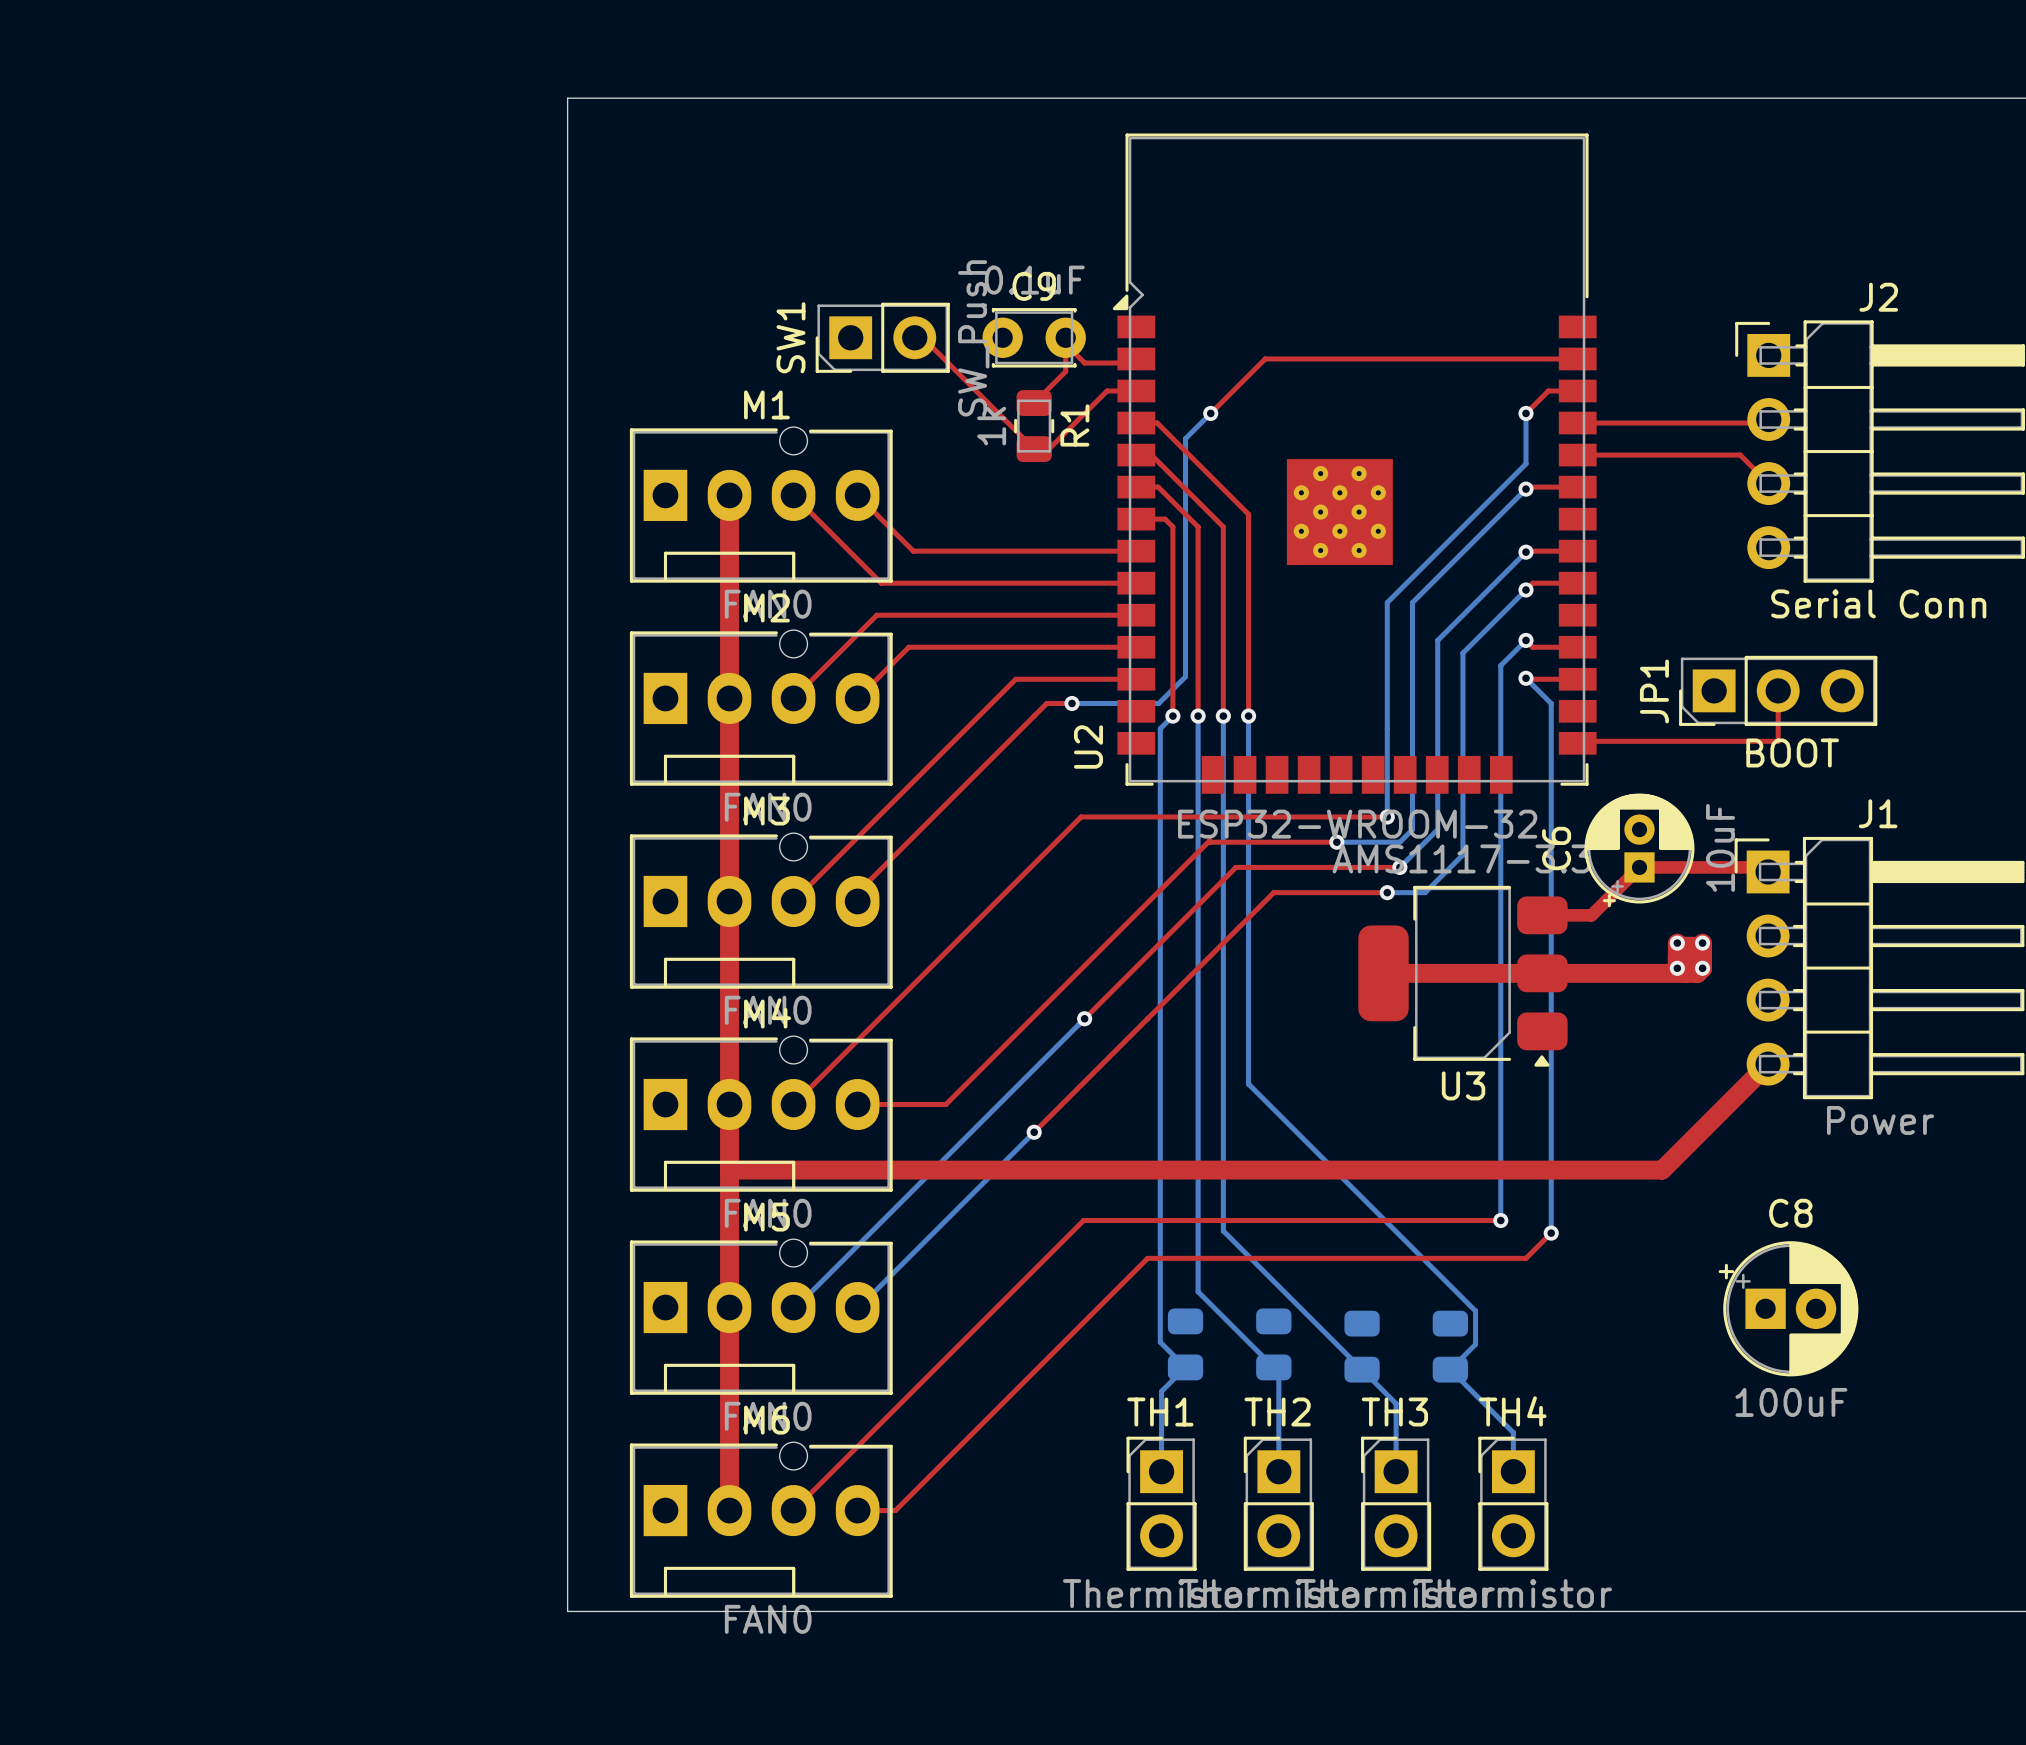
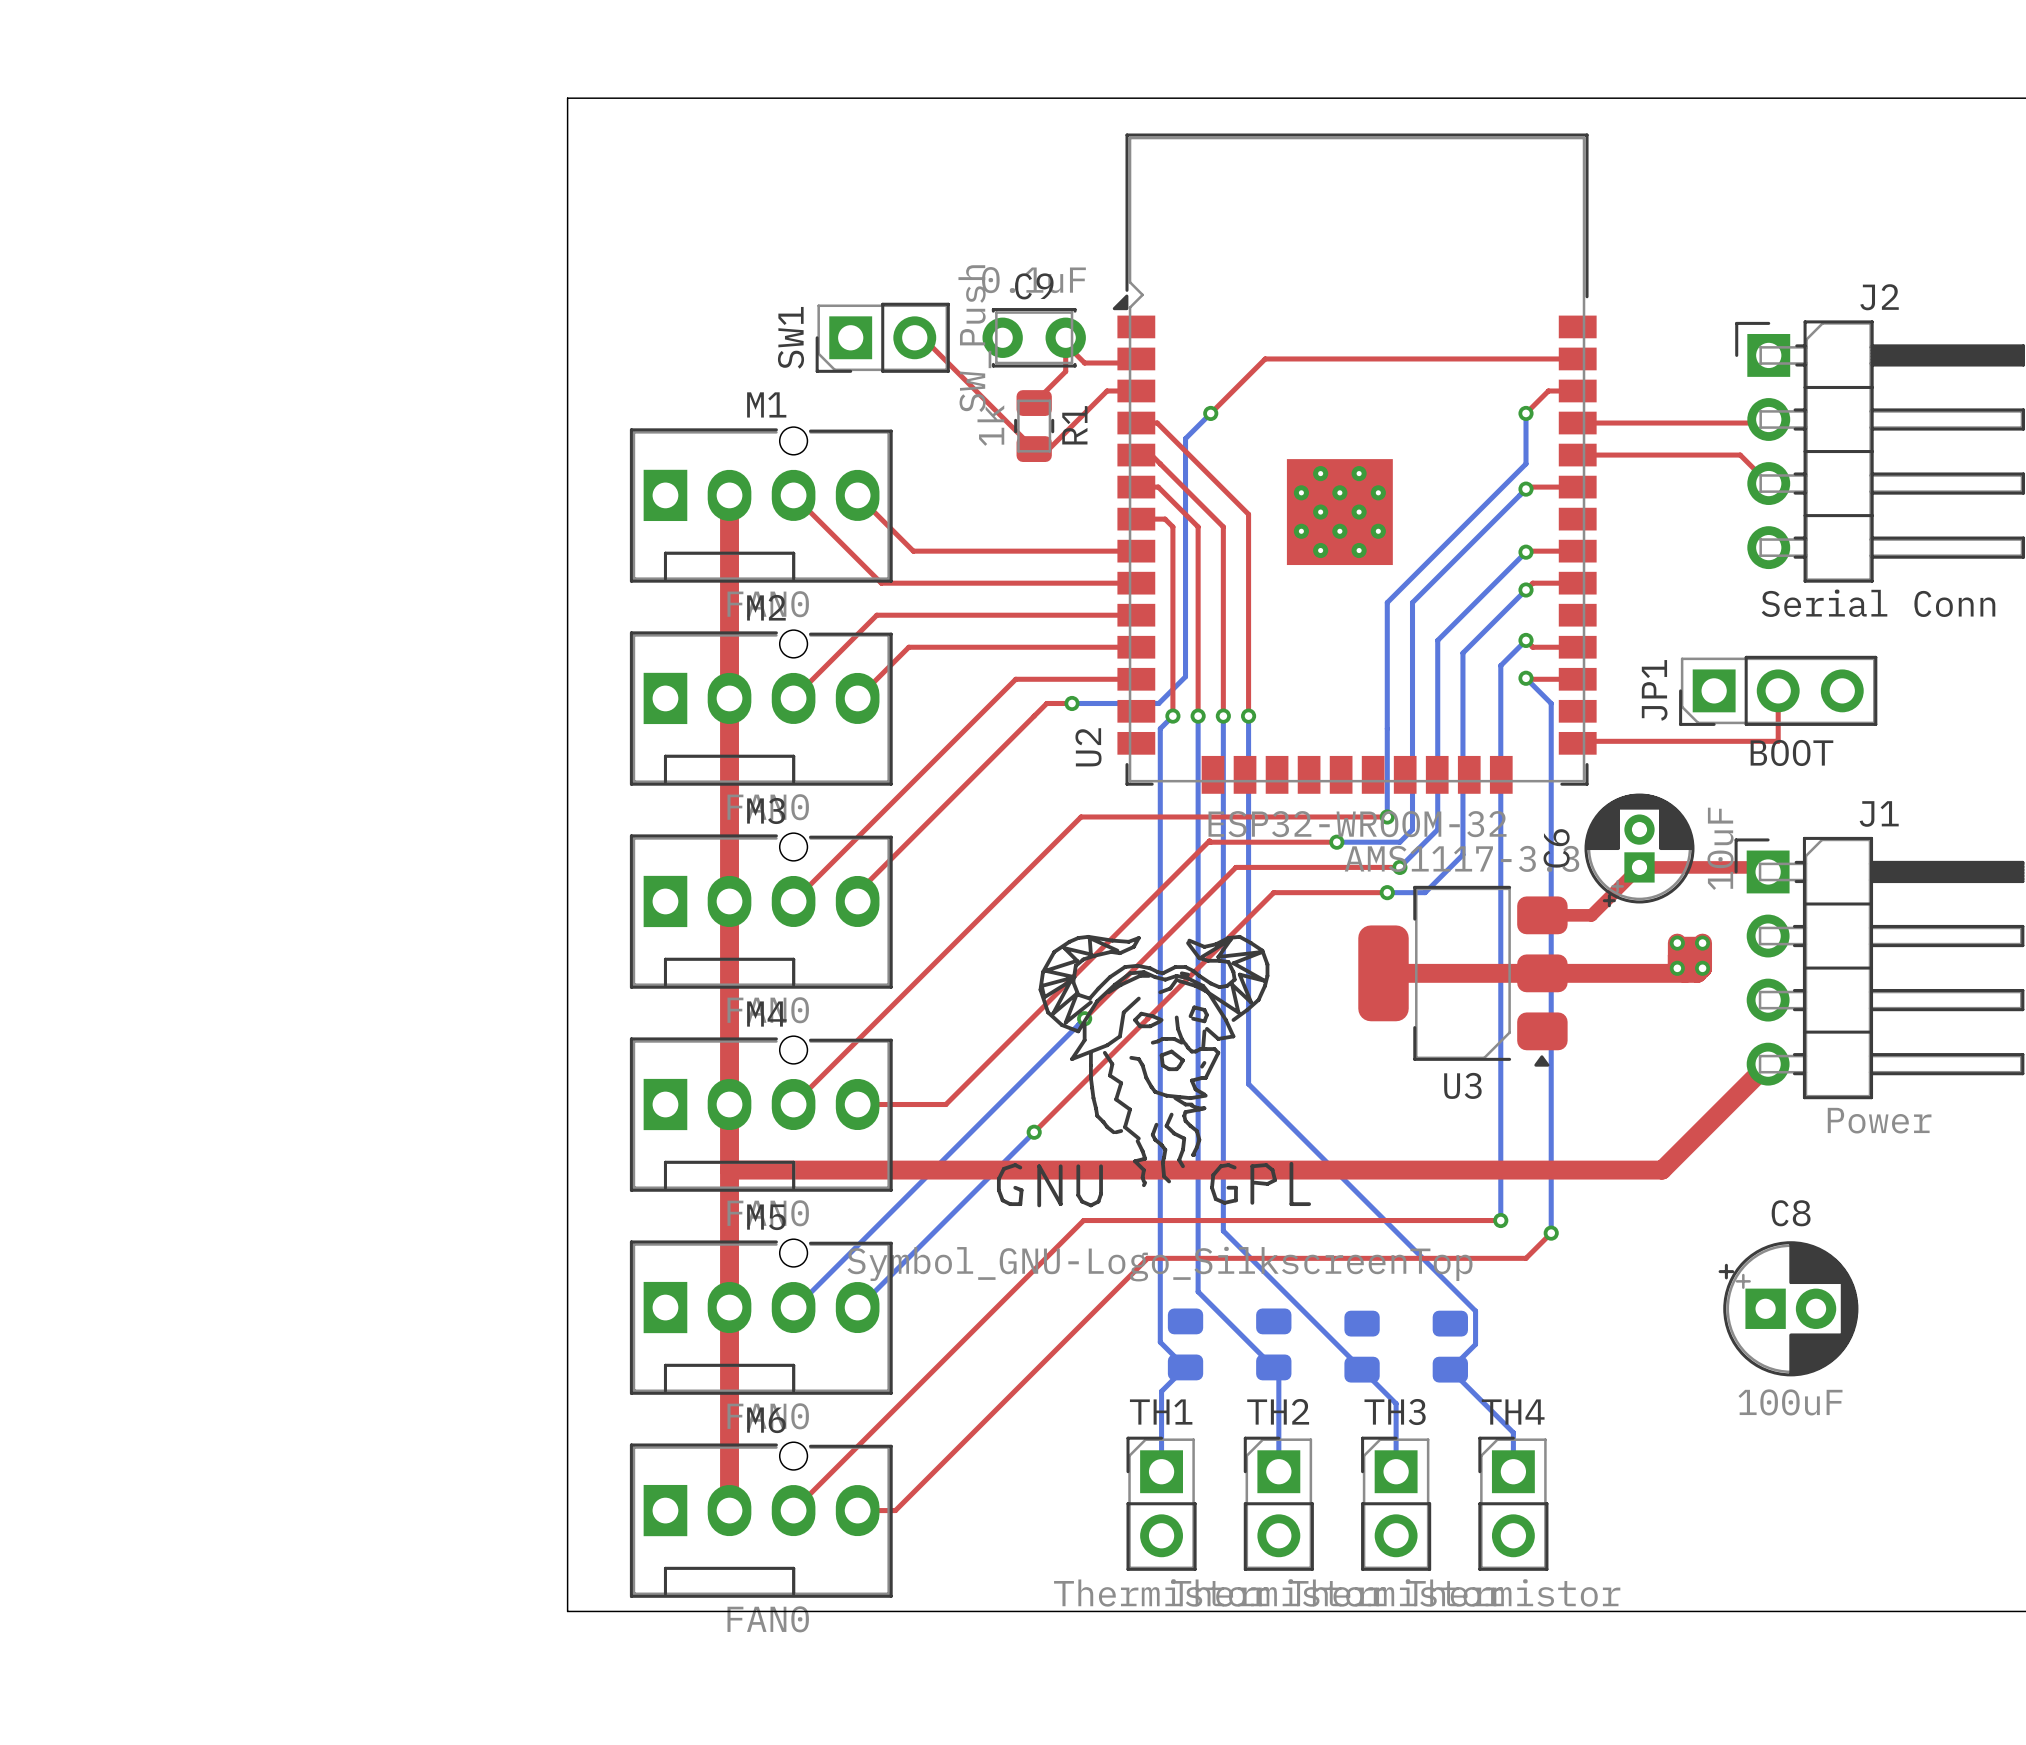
drawing: none -> [996, 934, 1312, 1208]

